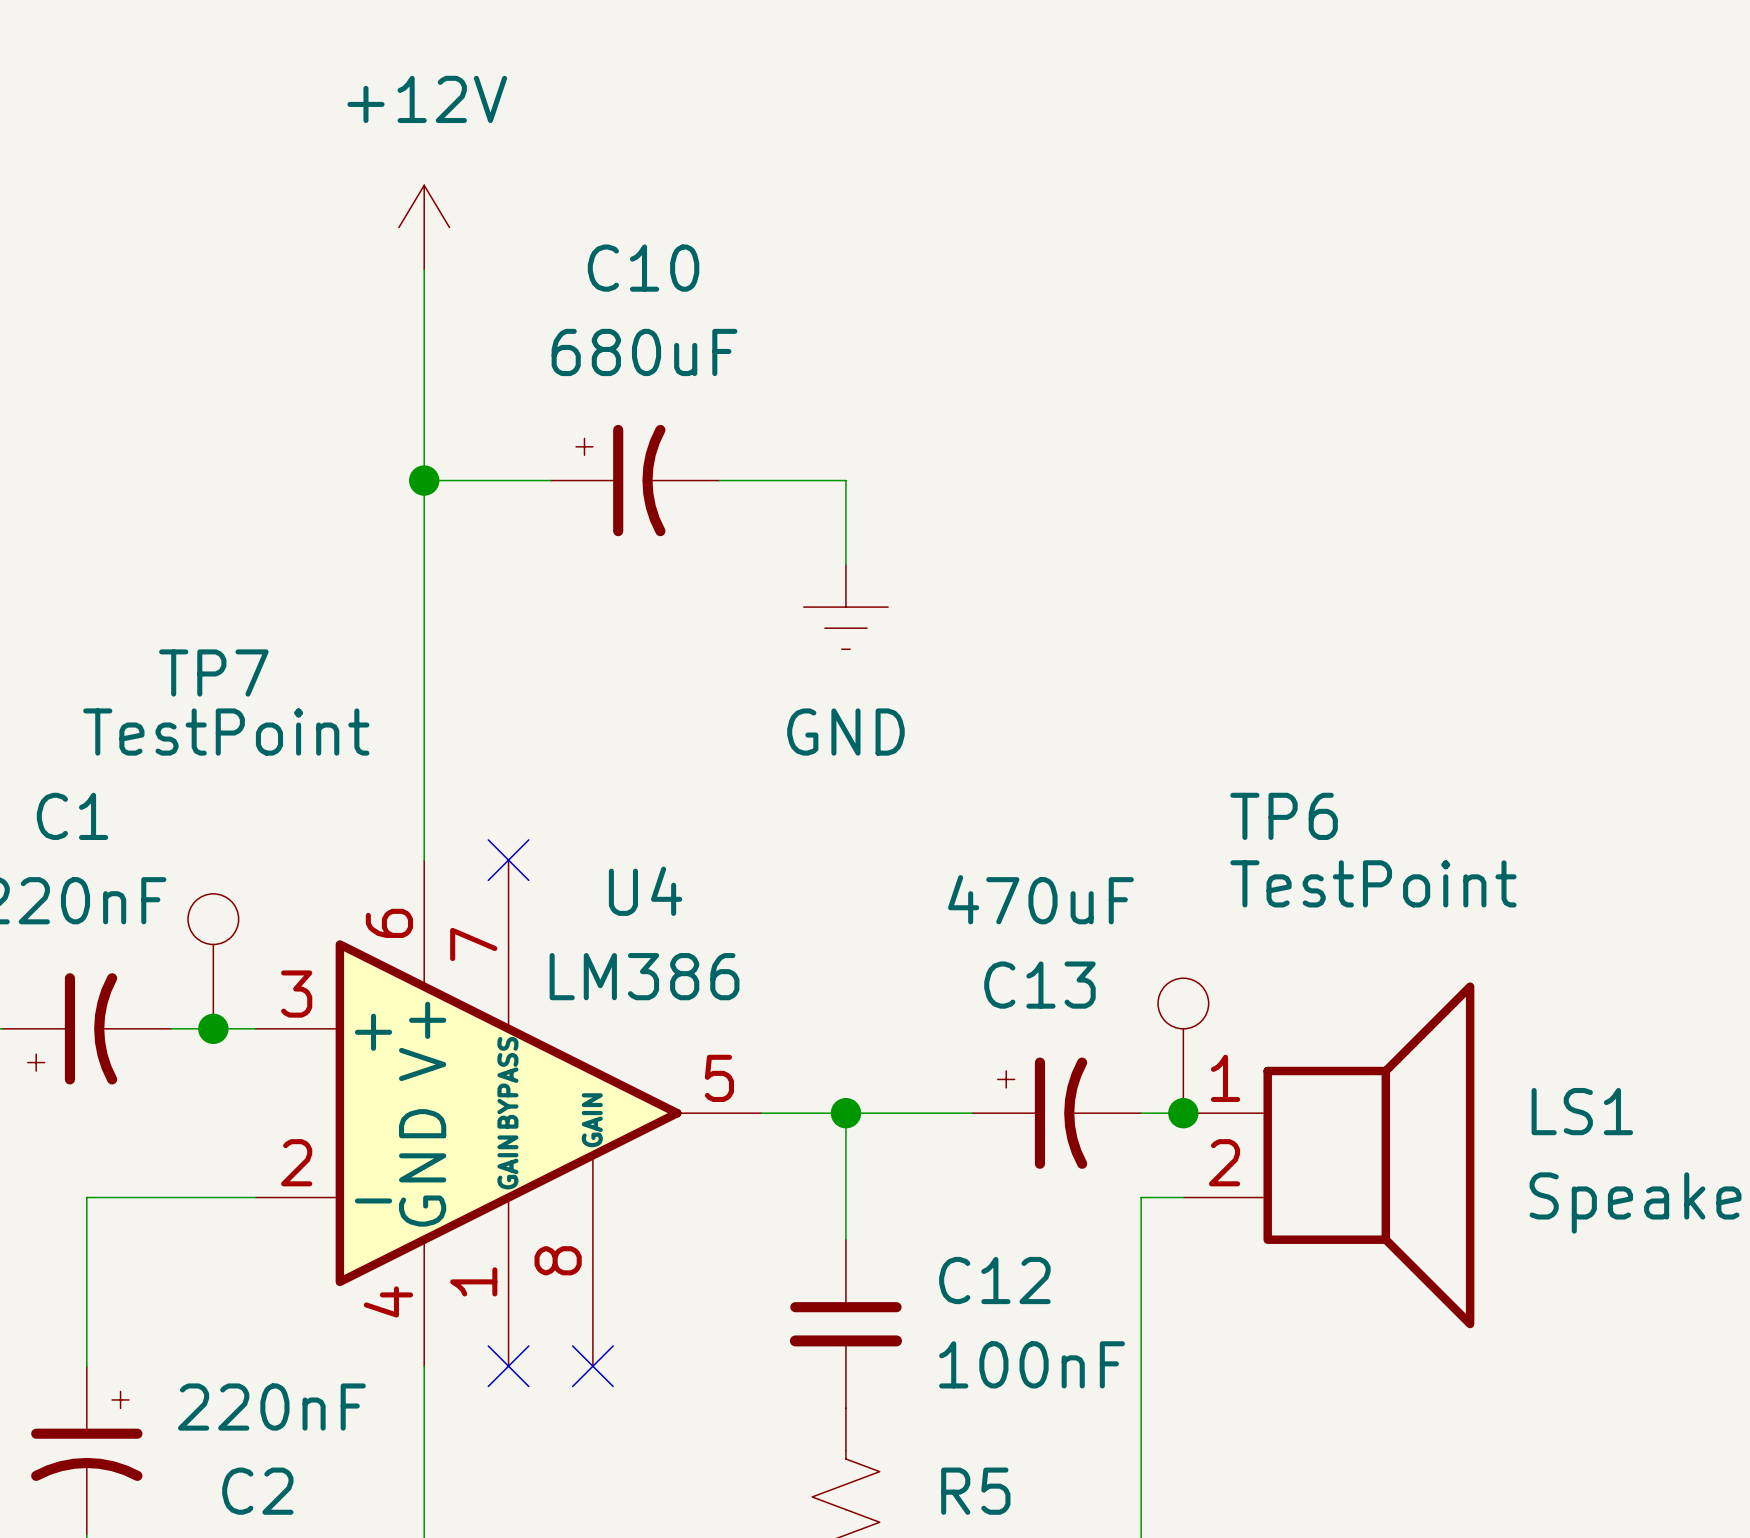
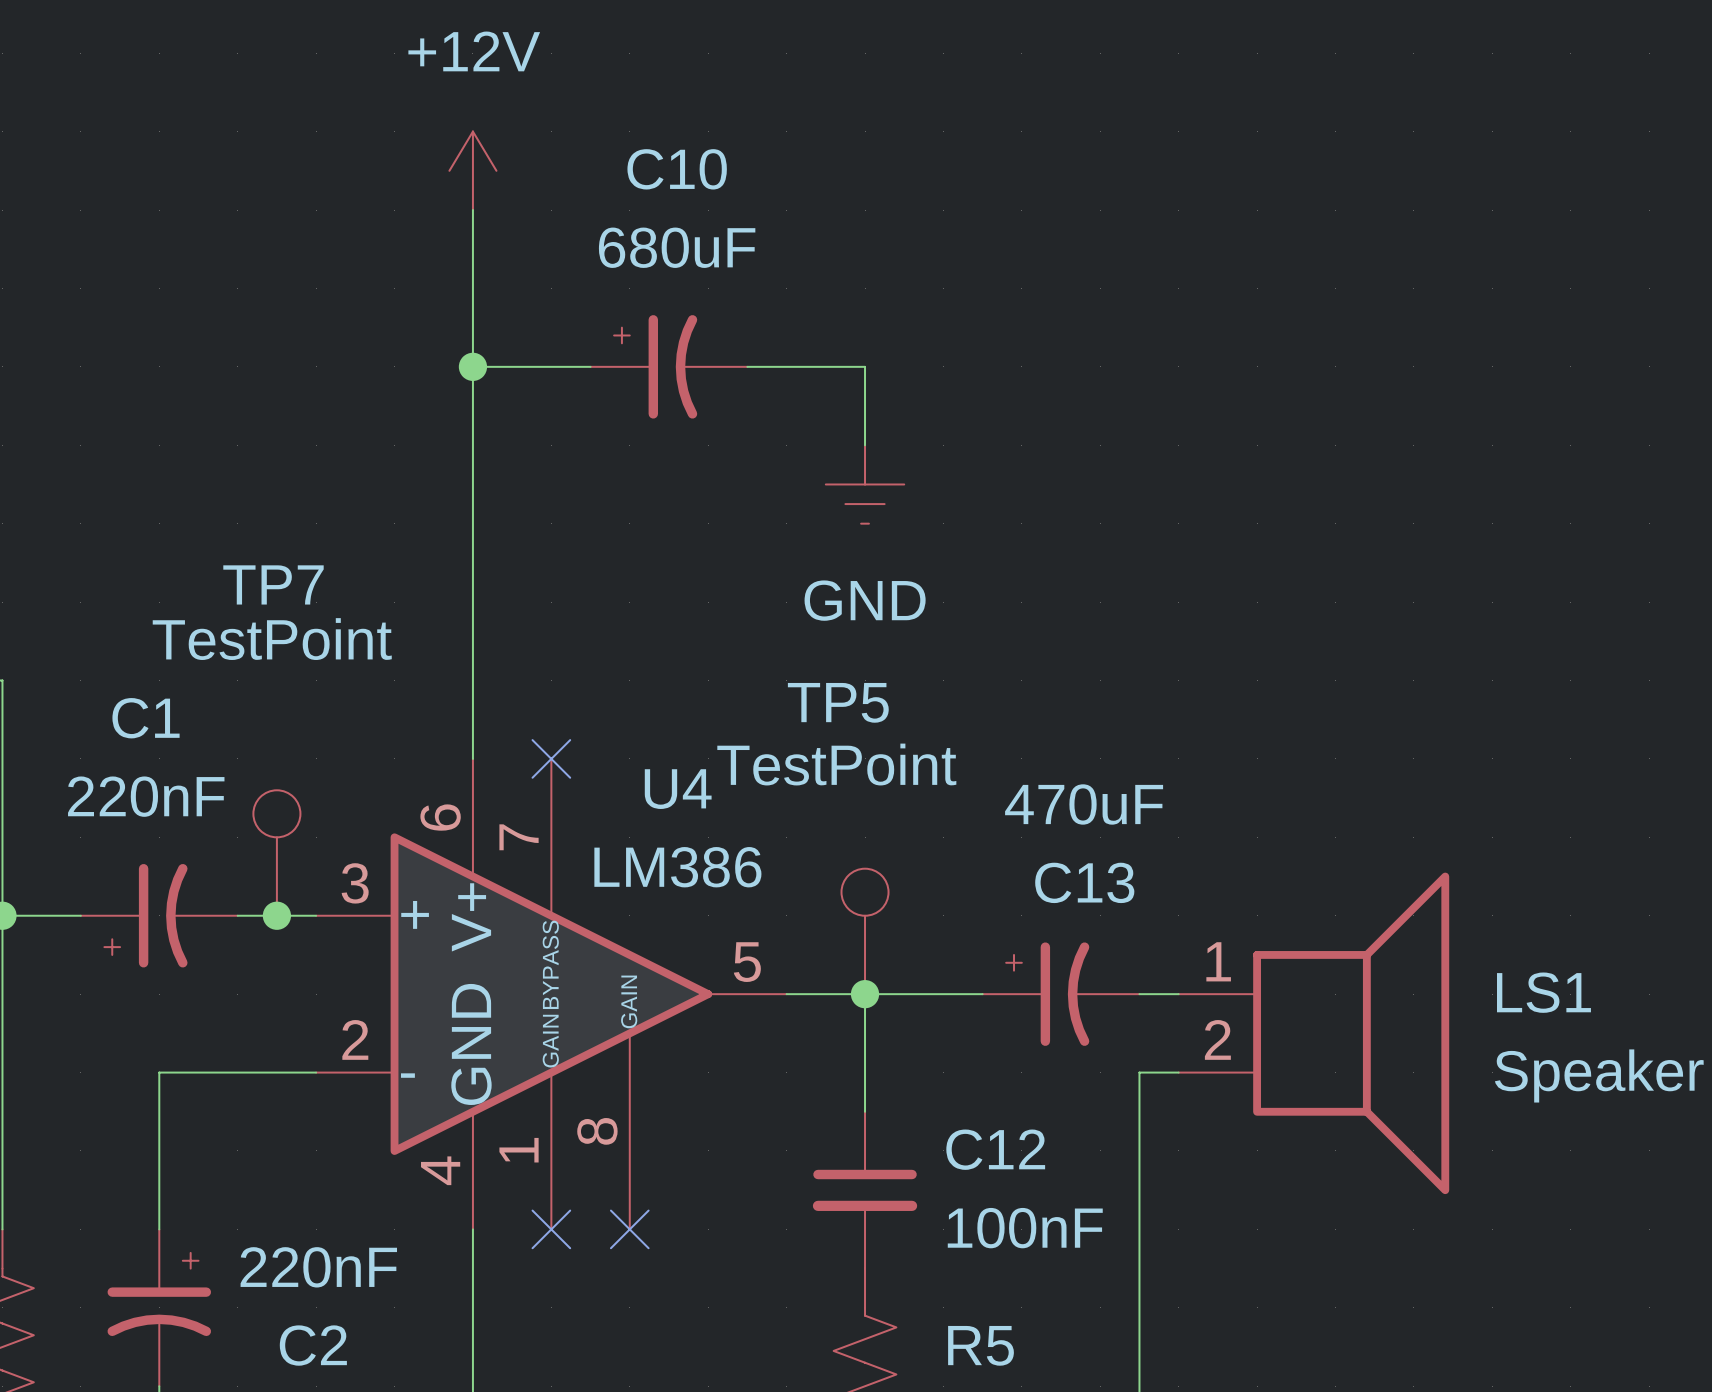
wire: (424, 480) (550, 480) -> (472, 366) (590, 366)
junction position: (424, 480) -> (472, 366)
C10 position: (635, 480) -> (668, 366)
wire: (719, 480) (845, 480) -> (747, 366) (865, 366) (865, 406)
power symbol position: GND (845, 607) -> GND (865, 484)
C13 value position: 470uF (1040, 899) -> 470uF (1084, 804)
C13 name position: C13 (1039, 985) -> C13 (1084, 882)
TP5: none -> TestPoint (865, 931)
TP6: TestPoint (1183, 1045) -> none
junction: (1183, 1113) -> none

